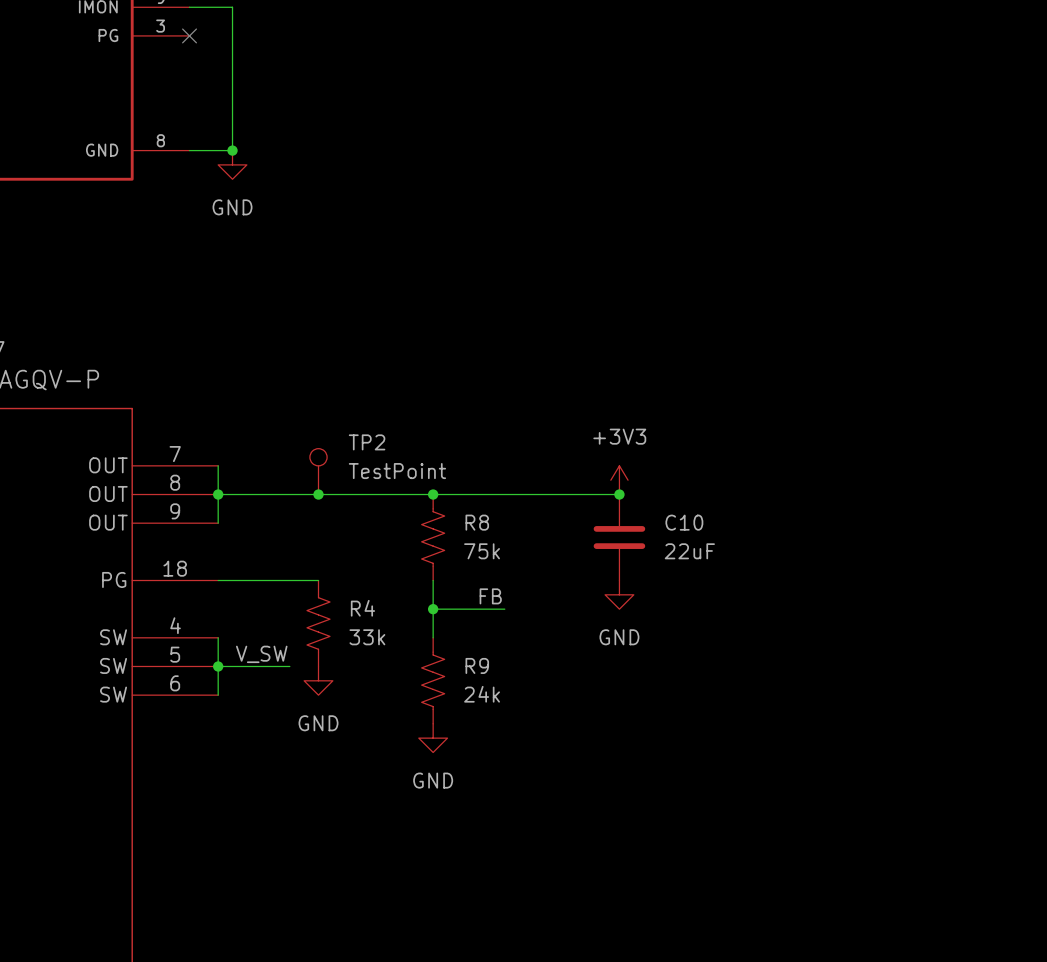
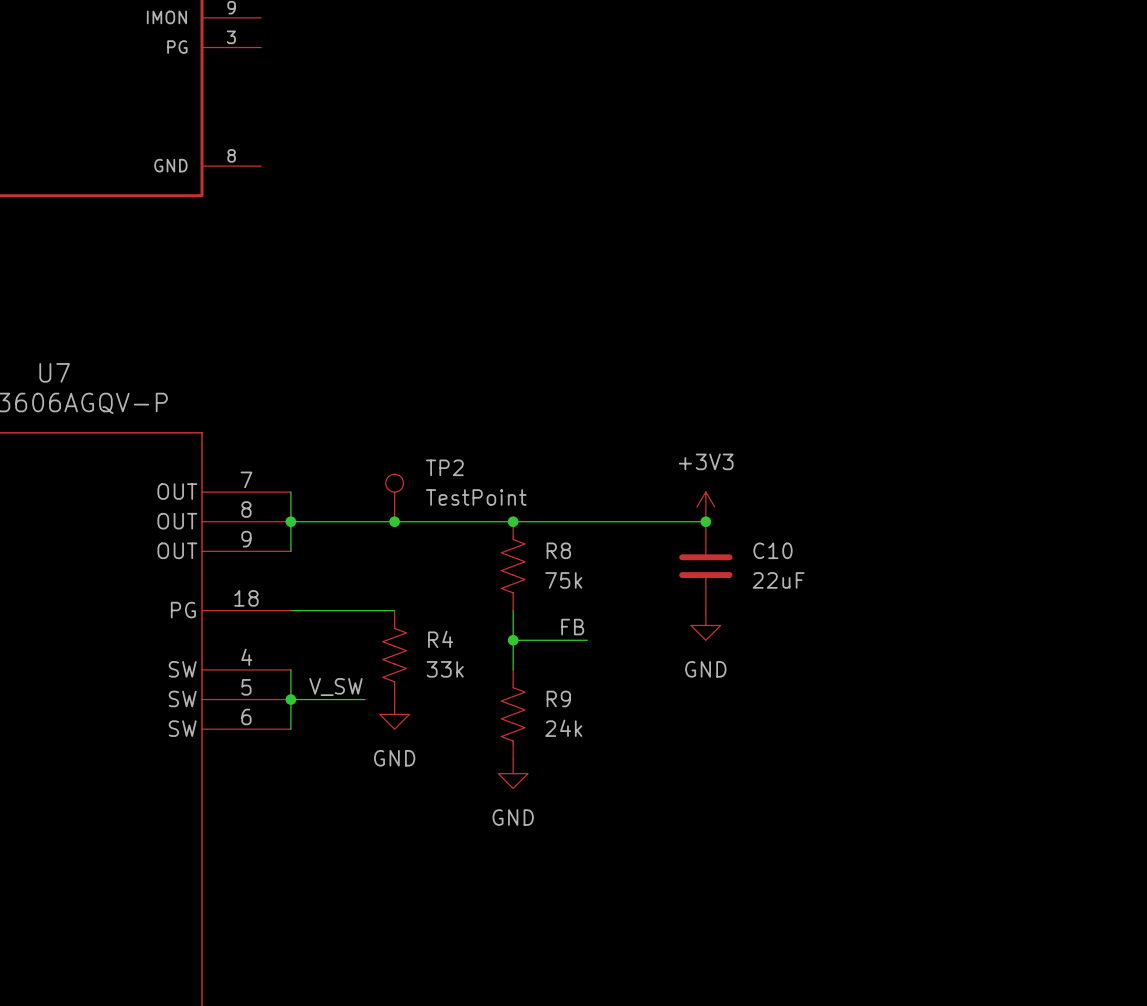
wire: (189, 7) (232, 7) (232, 150) (189, 150) -> none
no-connect mark: (189, 35) -> none
junction: (232, 150) -> none
power symbol: GND (232, 164) -> none

